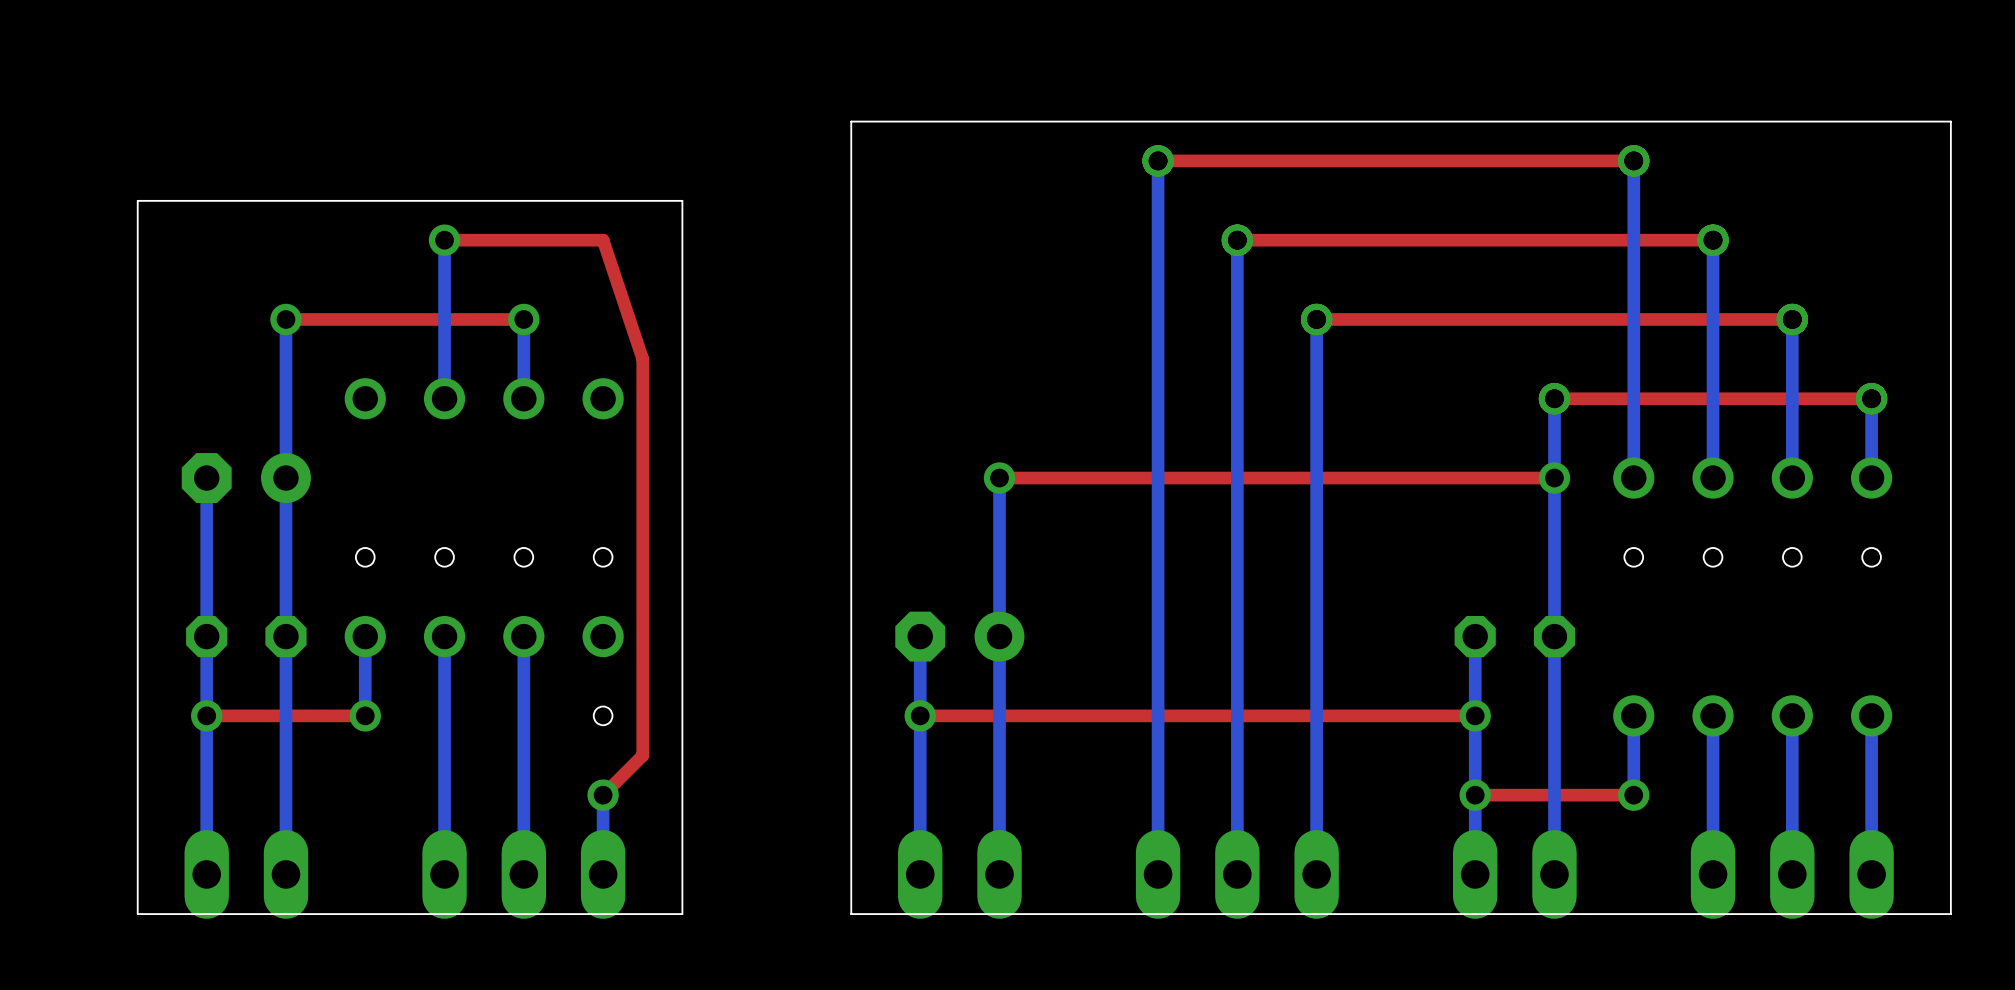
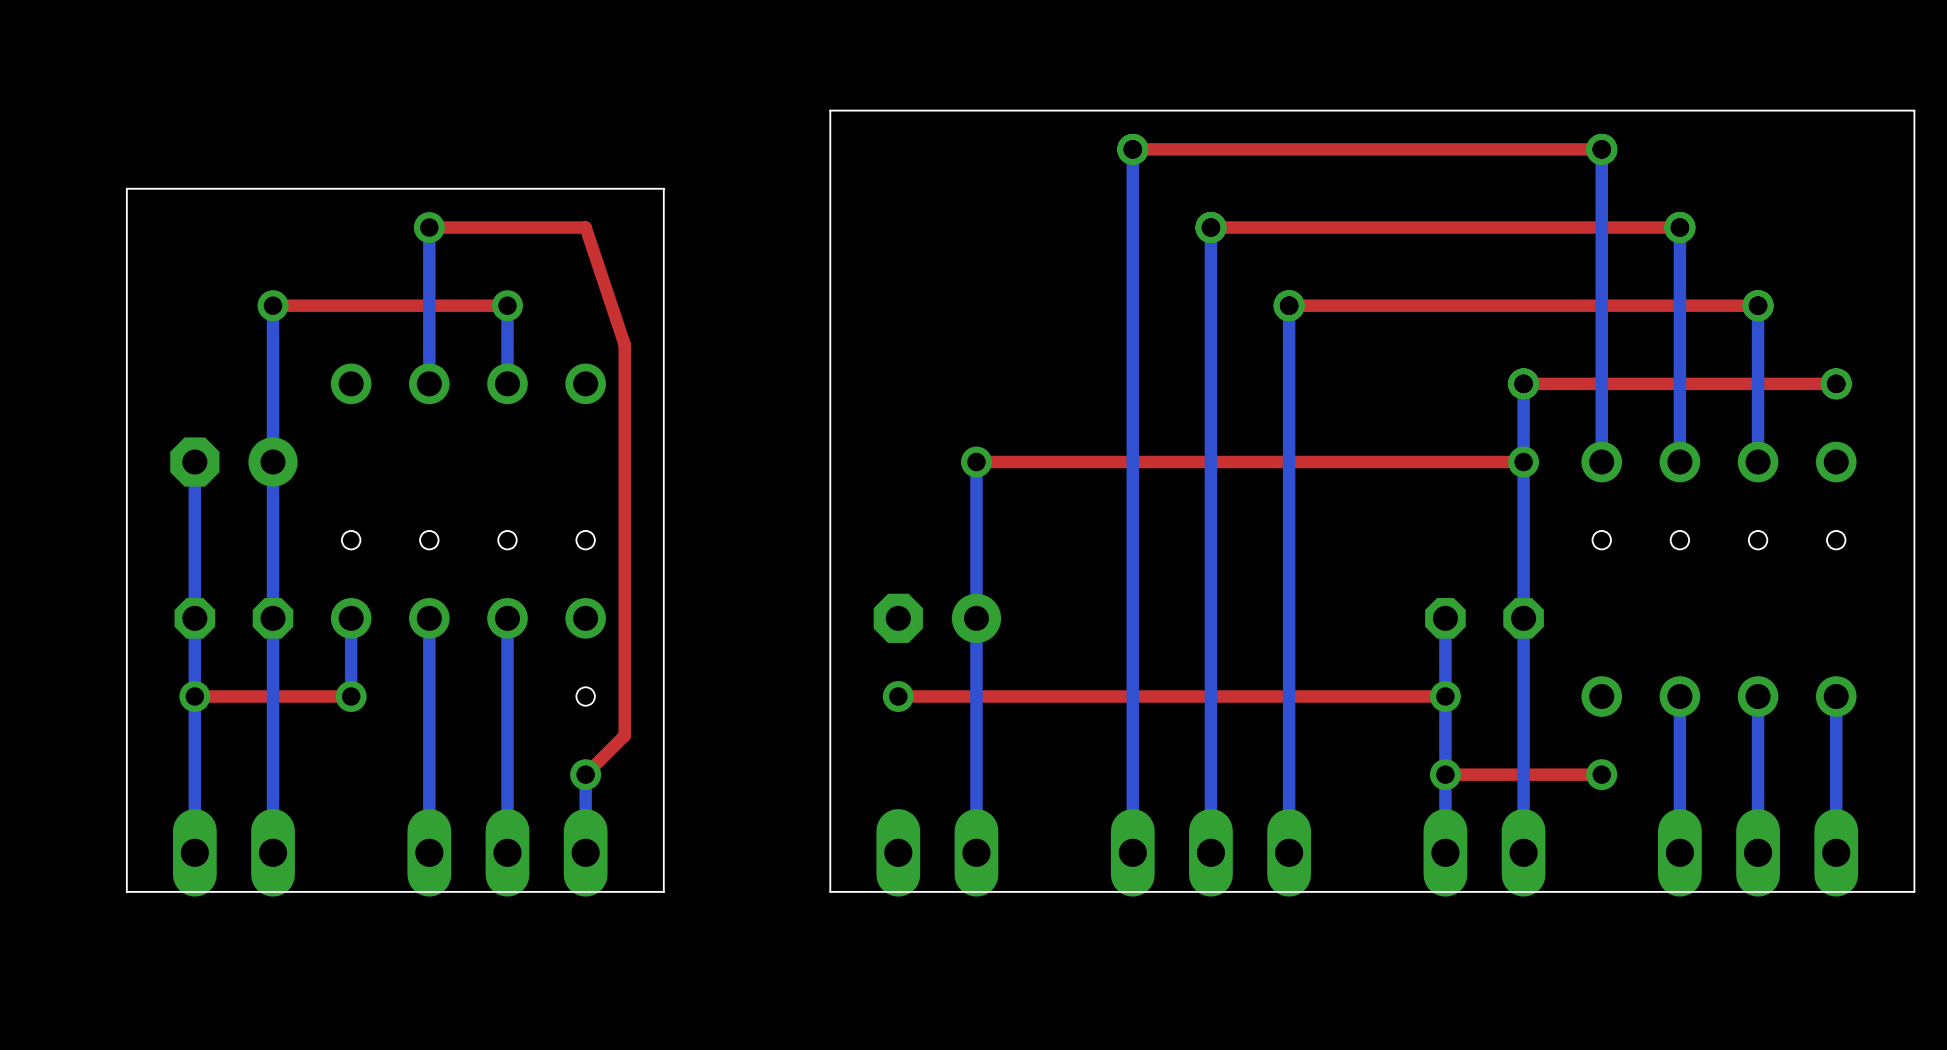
bottom track: (1871, 398) (1871, 478) -> none
bottom track: (920, 636) (920, 874) -> none
bottom track: (1633, 715) (1633, 795) -> none

